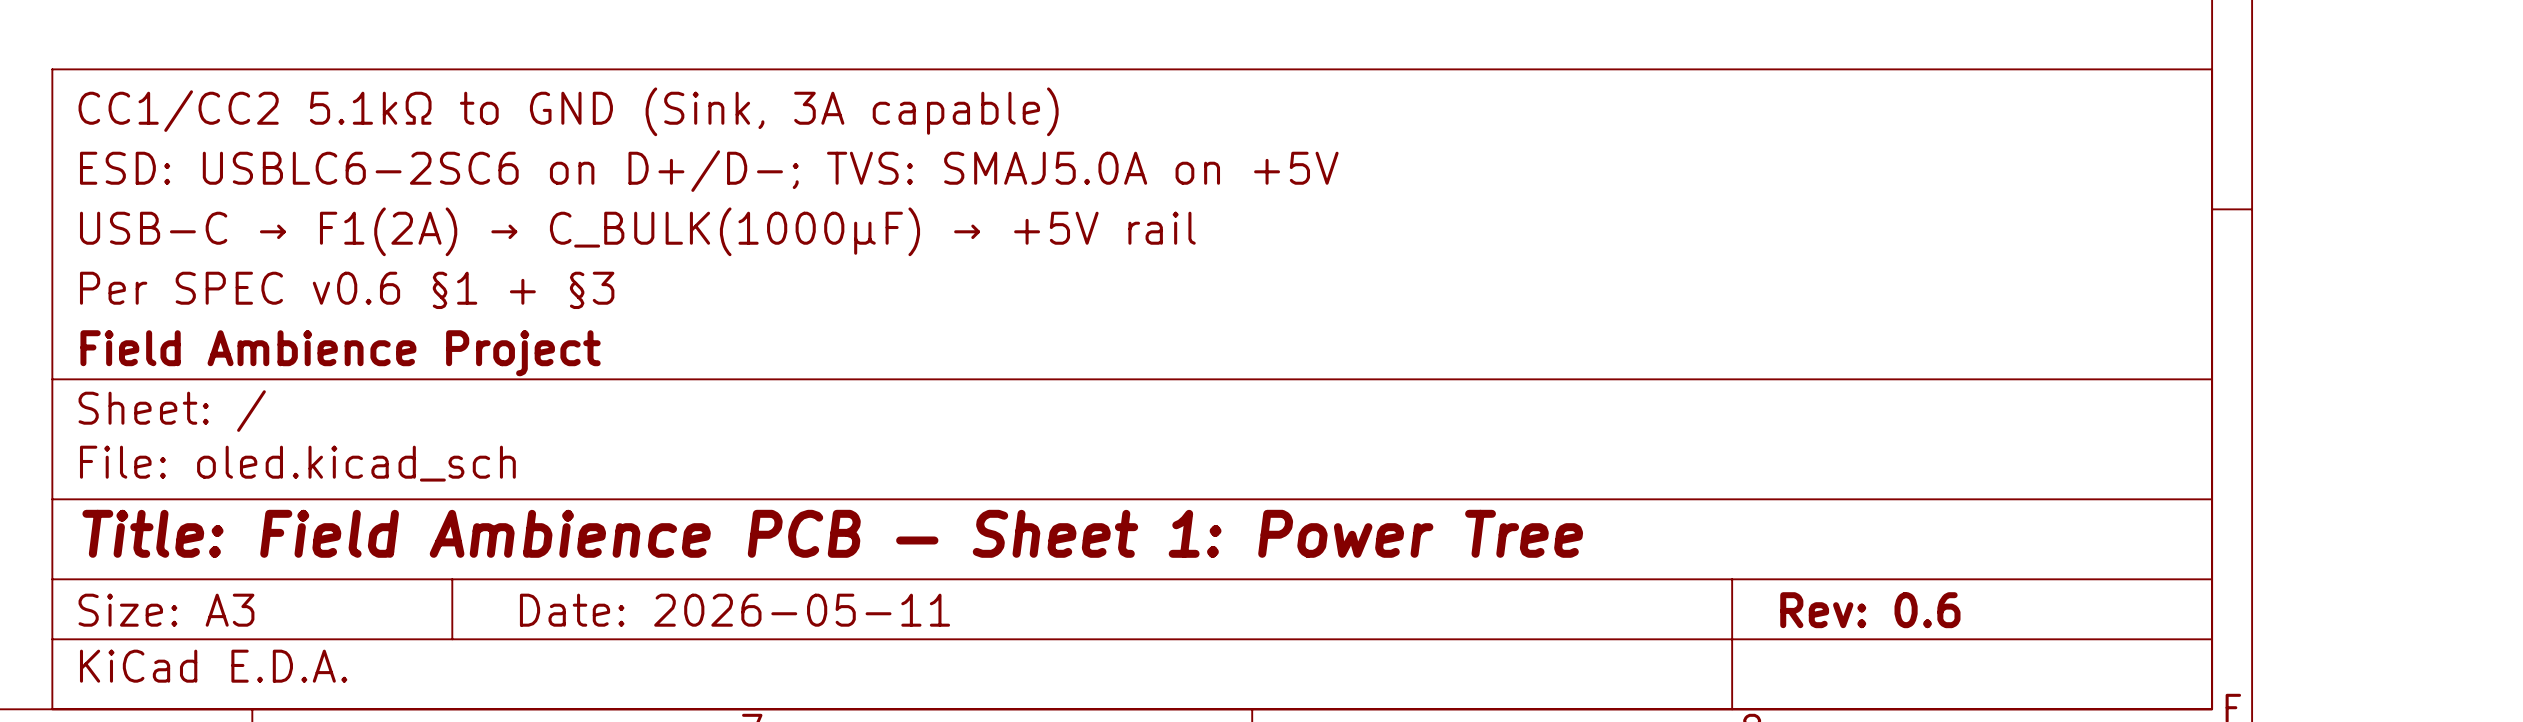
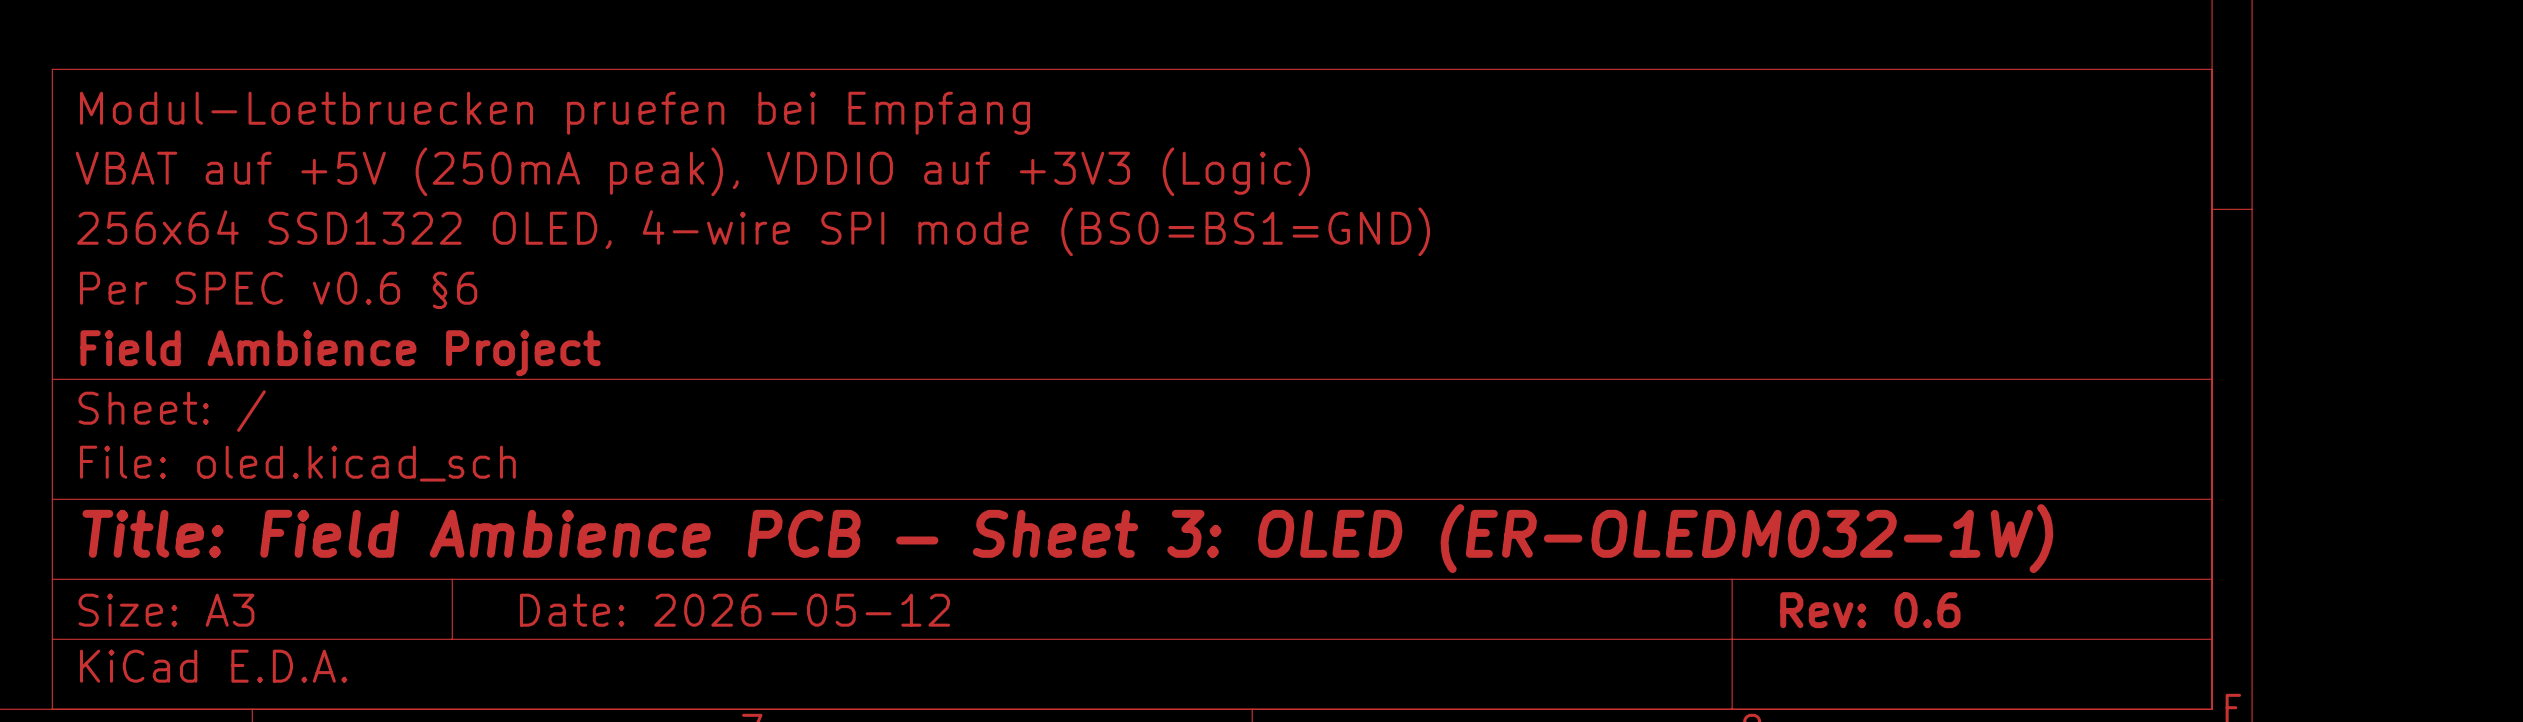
title block: CC1/CC2 5.1kΩ to GND (Sink, 3A capable) (568, 111) -> Modul-Loetbruecken pruefen bei Empfang (555, 113)
title block: ESD: USBLC6-2SC6 on D+/D-; TVS: SMAJ5.0A on +5V (709, 171) -> VBAT auf +5V (250mA peak), VDDIO auf +3V3 (Logic) (692, 171)
title block: USB-C → F1(2A) → C_BULK(1000µF) → +5V rail (637, 231) -> 256x64 SSD1322 OLED, 4-wire SPI mode (BS0=BS1=GND) (753, 231)
title block: Per SPEC v0.6 §1 + §3 (347, 290) -> Per SPEC v0.6 §6 (278, 290)
title block: Title: Field Ambience PCB — Sheet 1: Power Tree (832, 533) -> Title: Field Ambience PCB — Sheet 3: OLED (ER-OLEDM032-1W) (1067, 538)
title block: Date: 2026-05-11 (734, 610) -> Date: 2026-05-12 (734, 610)

